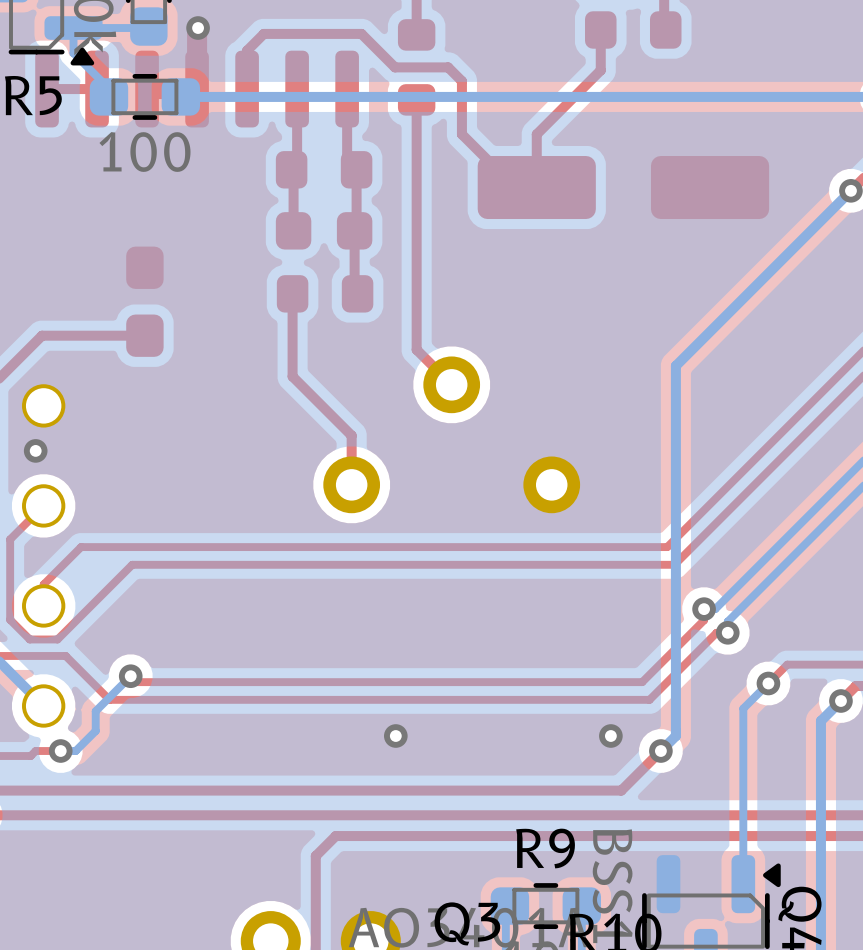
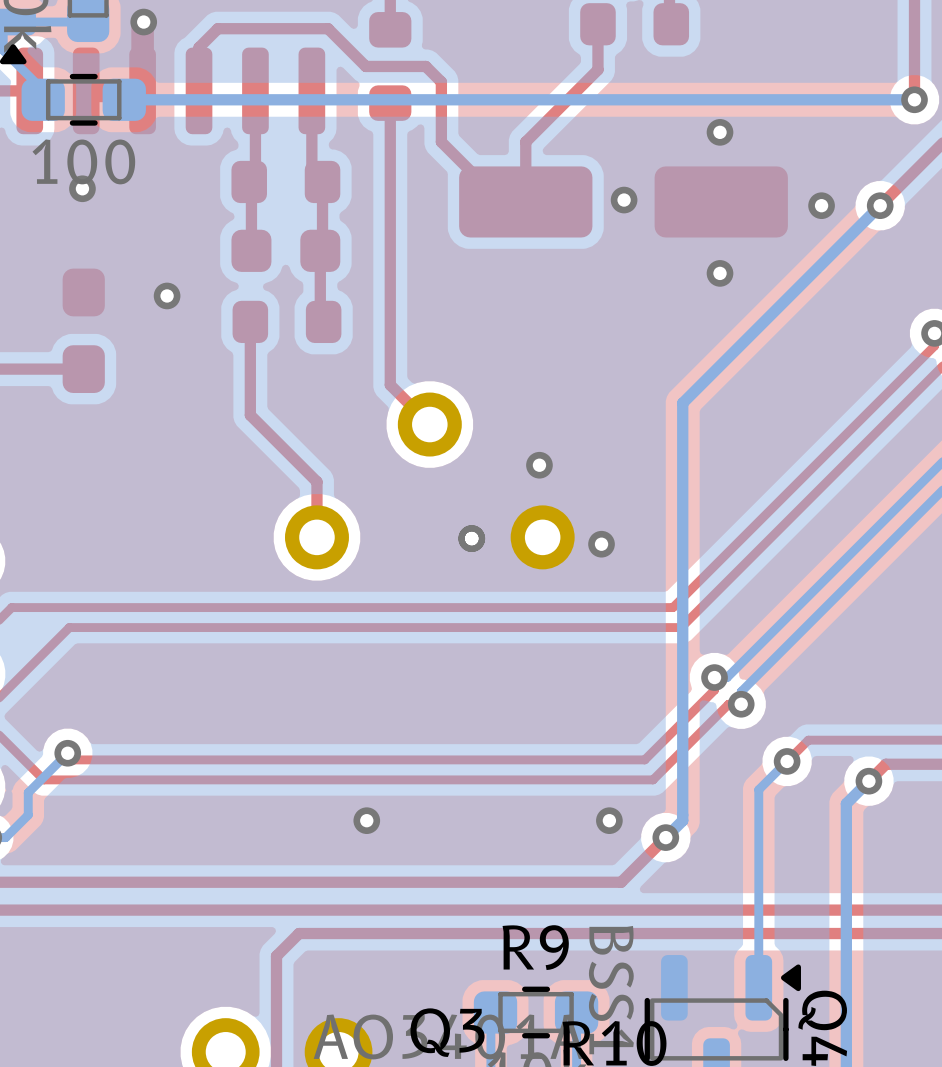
via: none -> (720, 132)
via: none -> (82, 188)
via: none -> (624, 200)
via: none -> (821, 205)
via: none -> (720, 273)
via: none -> (167, 295)
via: none -> (539, 465)
via: none -> (471, 538)
via: none -> (601, 544)

